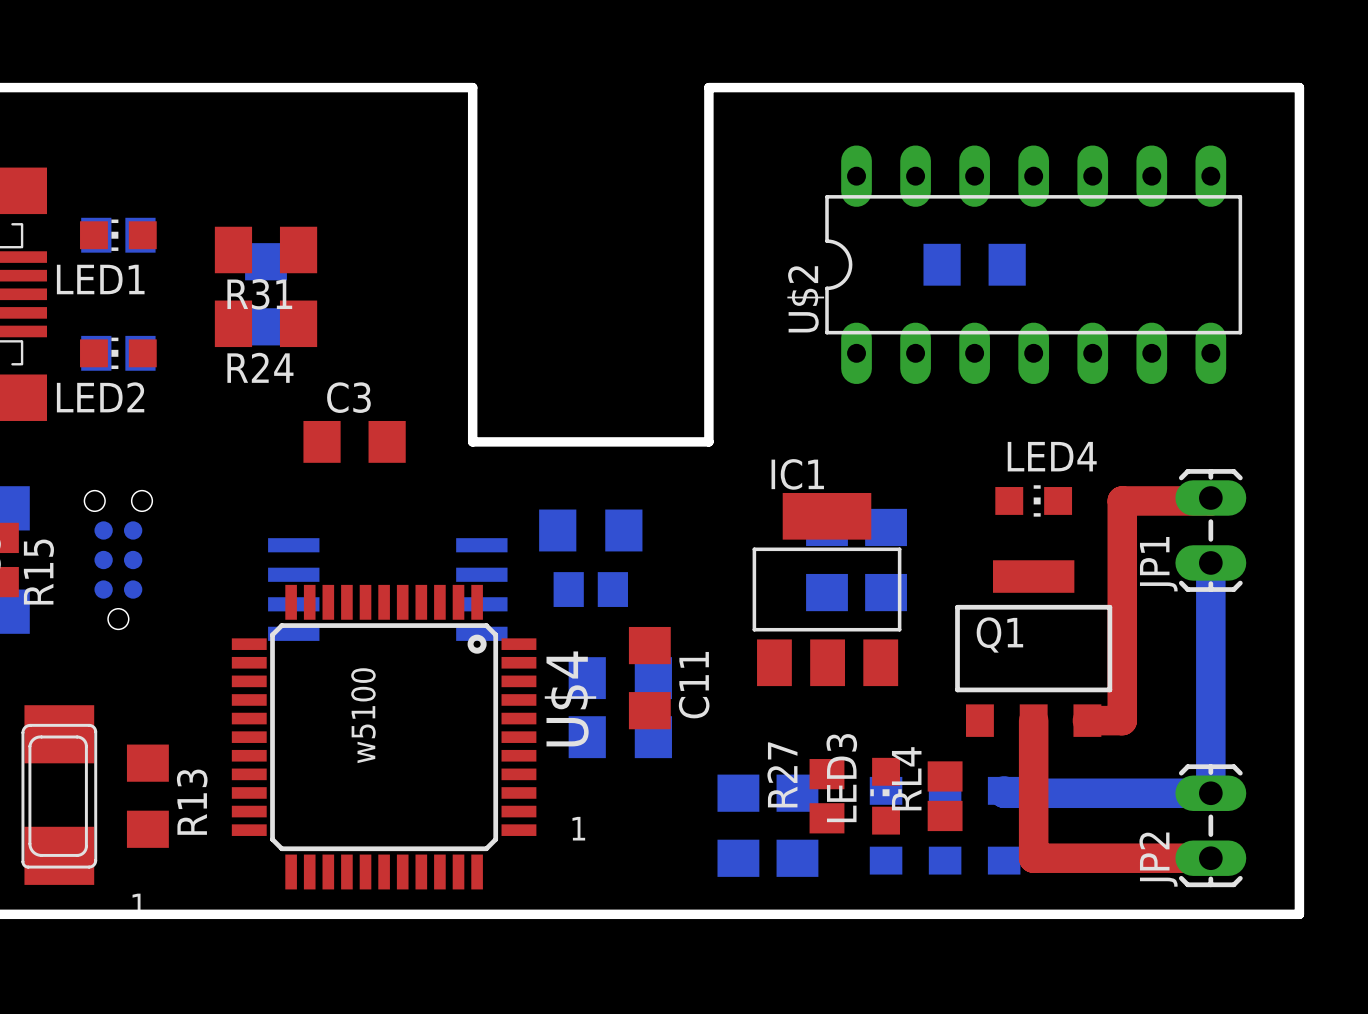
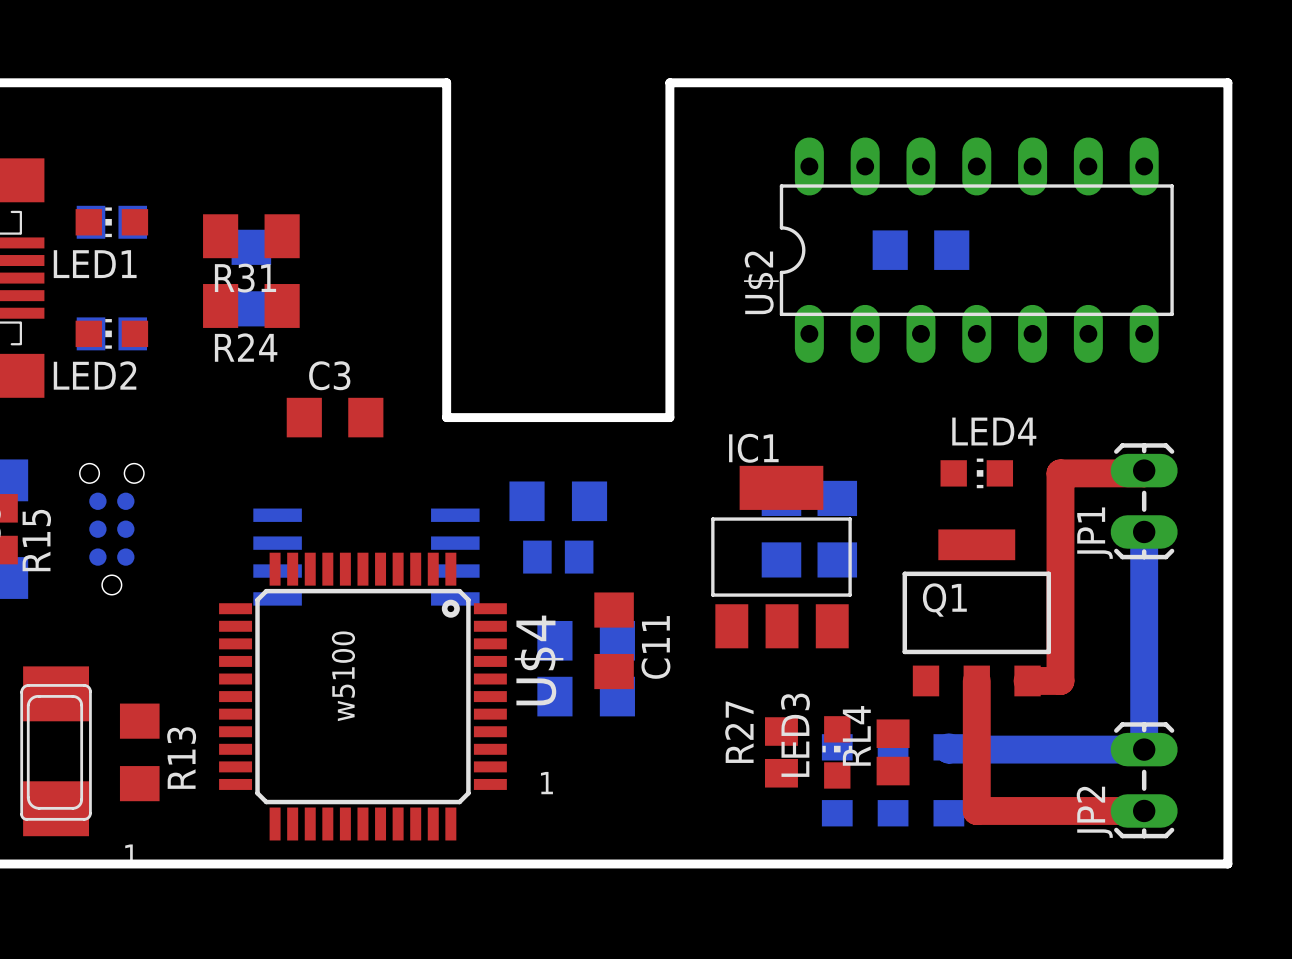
part: (738, 825) -> none
part: (797, 825) -> none

